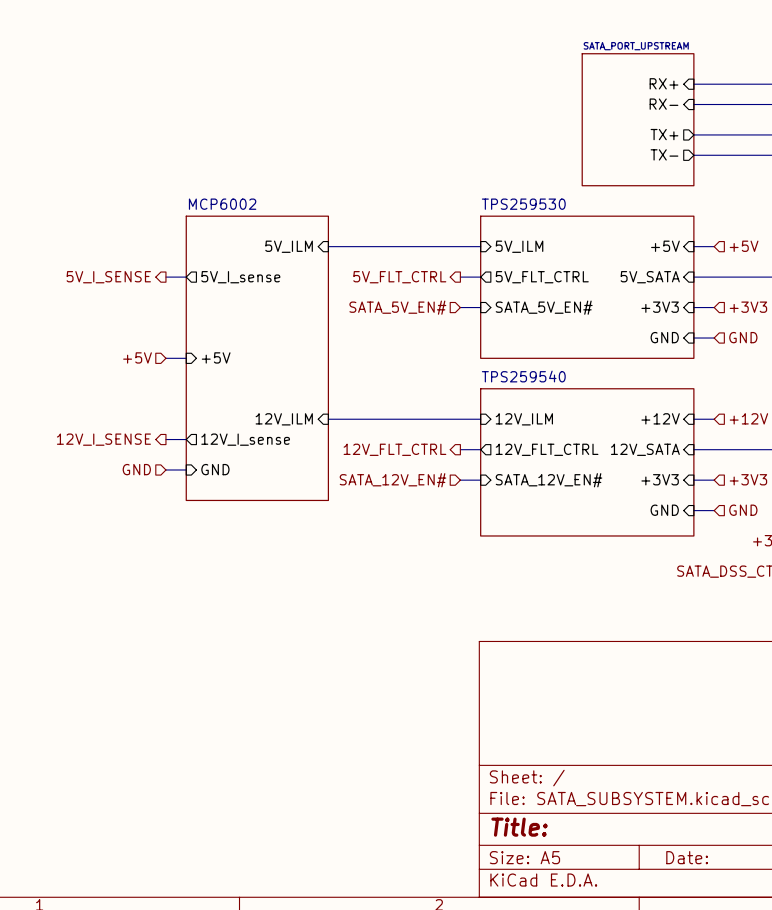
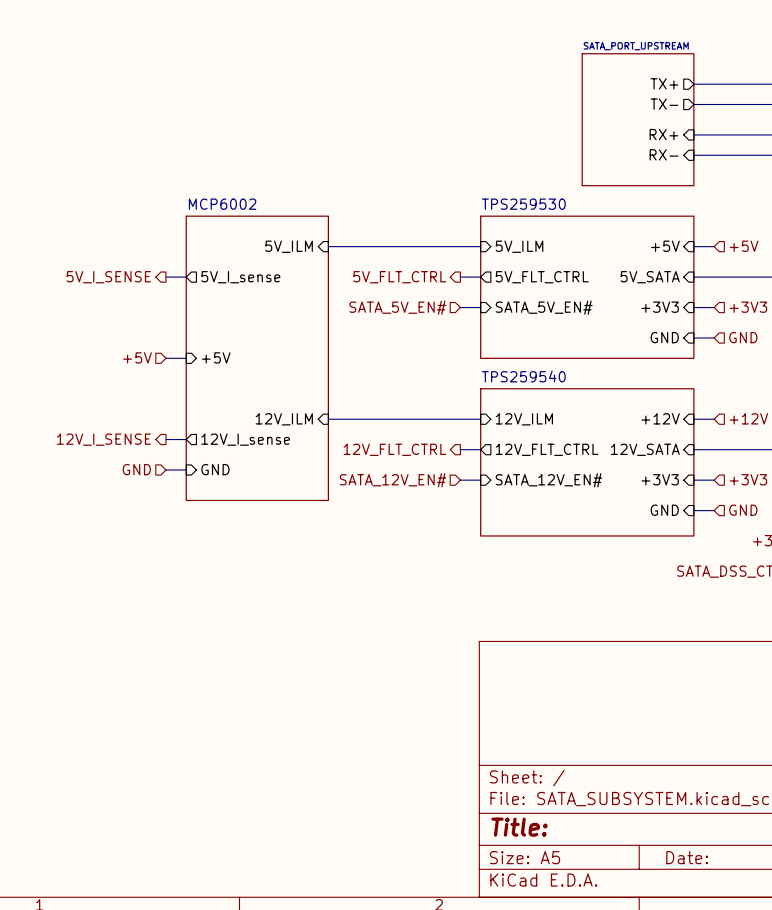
sheet pin shape: input (663, 83) -> output (664, 83)
sheet pin: RX+ (663, 83) -> TX+ (664, 83)
sheet pin shape: input (663, 104) -> output (664, 104)
sheet pin: RX- (663, 104) -> TX- (664, 104)
sheet pin shape: output (664, 134) -> input (663, 134)
sheet pin: TX+ (664, 134) -> RX+ (663, 134)
sheet pin shape: output (664, 154) -> input (663, 154)
sheet pin: TX- (664, 154) -> RX- (663, 154)

